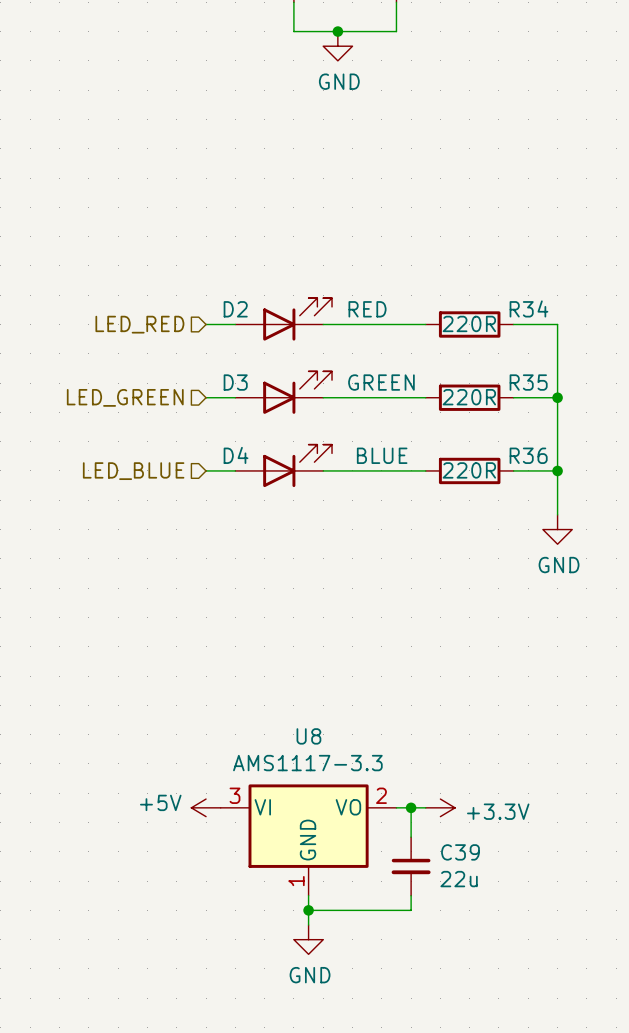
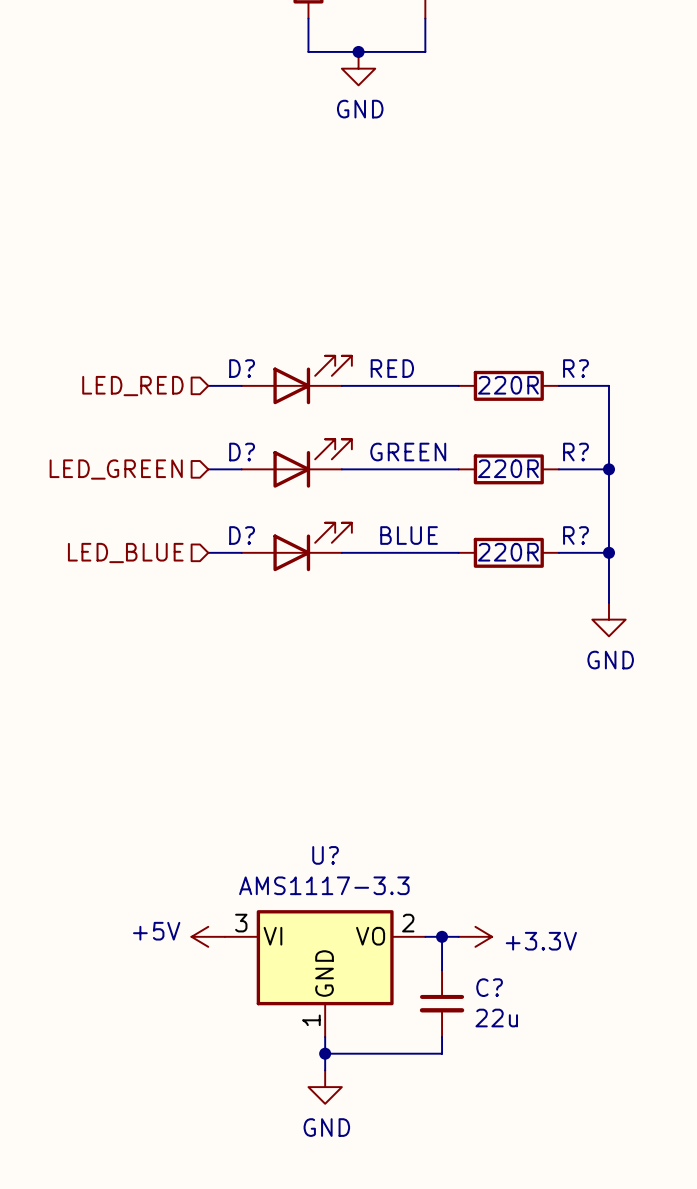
R34 name: R34 (528, 308) -> R? (576, 368)
D2 name: D2 (235, 309) -> D? (242, 368)
D3 name: D3 (235, 382) -> D? (242, 452)
R35 name: R35 (528, 382) -> R? (576, 452)
D4 name: D4 (236, 455) -> D? (242, 535)
R36 name: R36 (528, 455) -> R? (576, 535)
U8 name: U8 (308, 736) -> U? (325, 855)
C39 name: C39 (460, 852) -> C? (489, 987)

